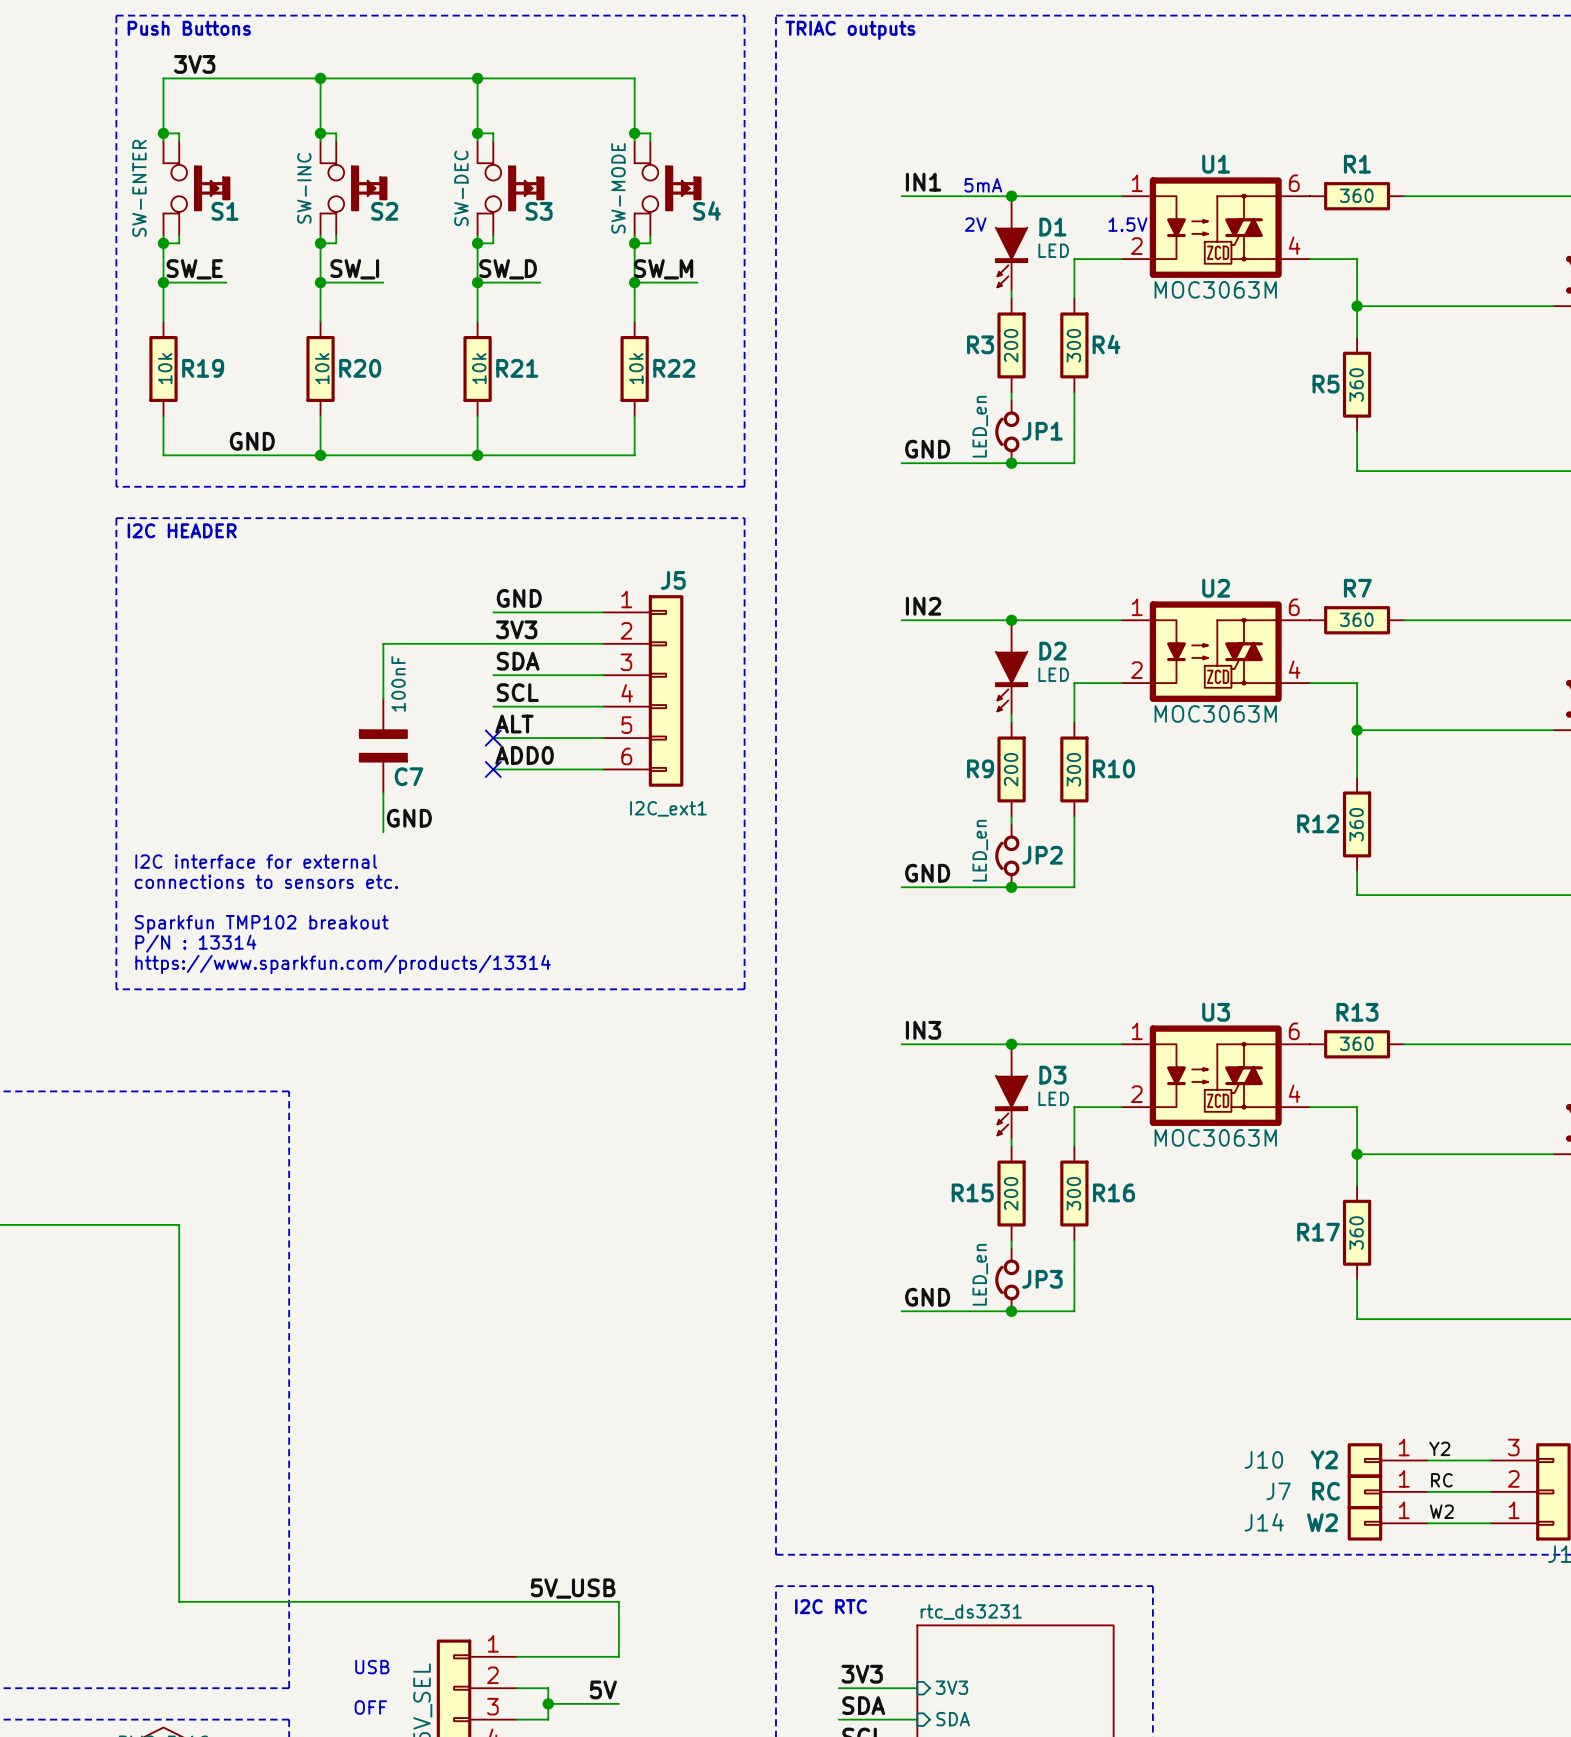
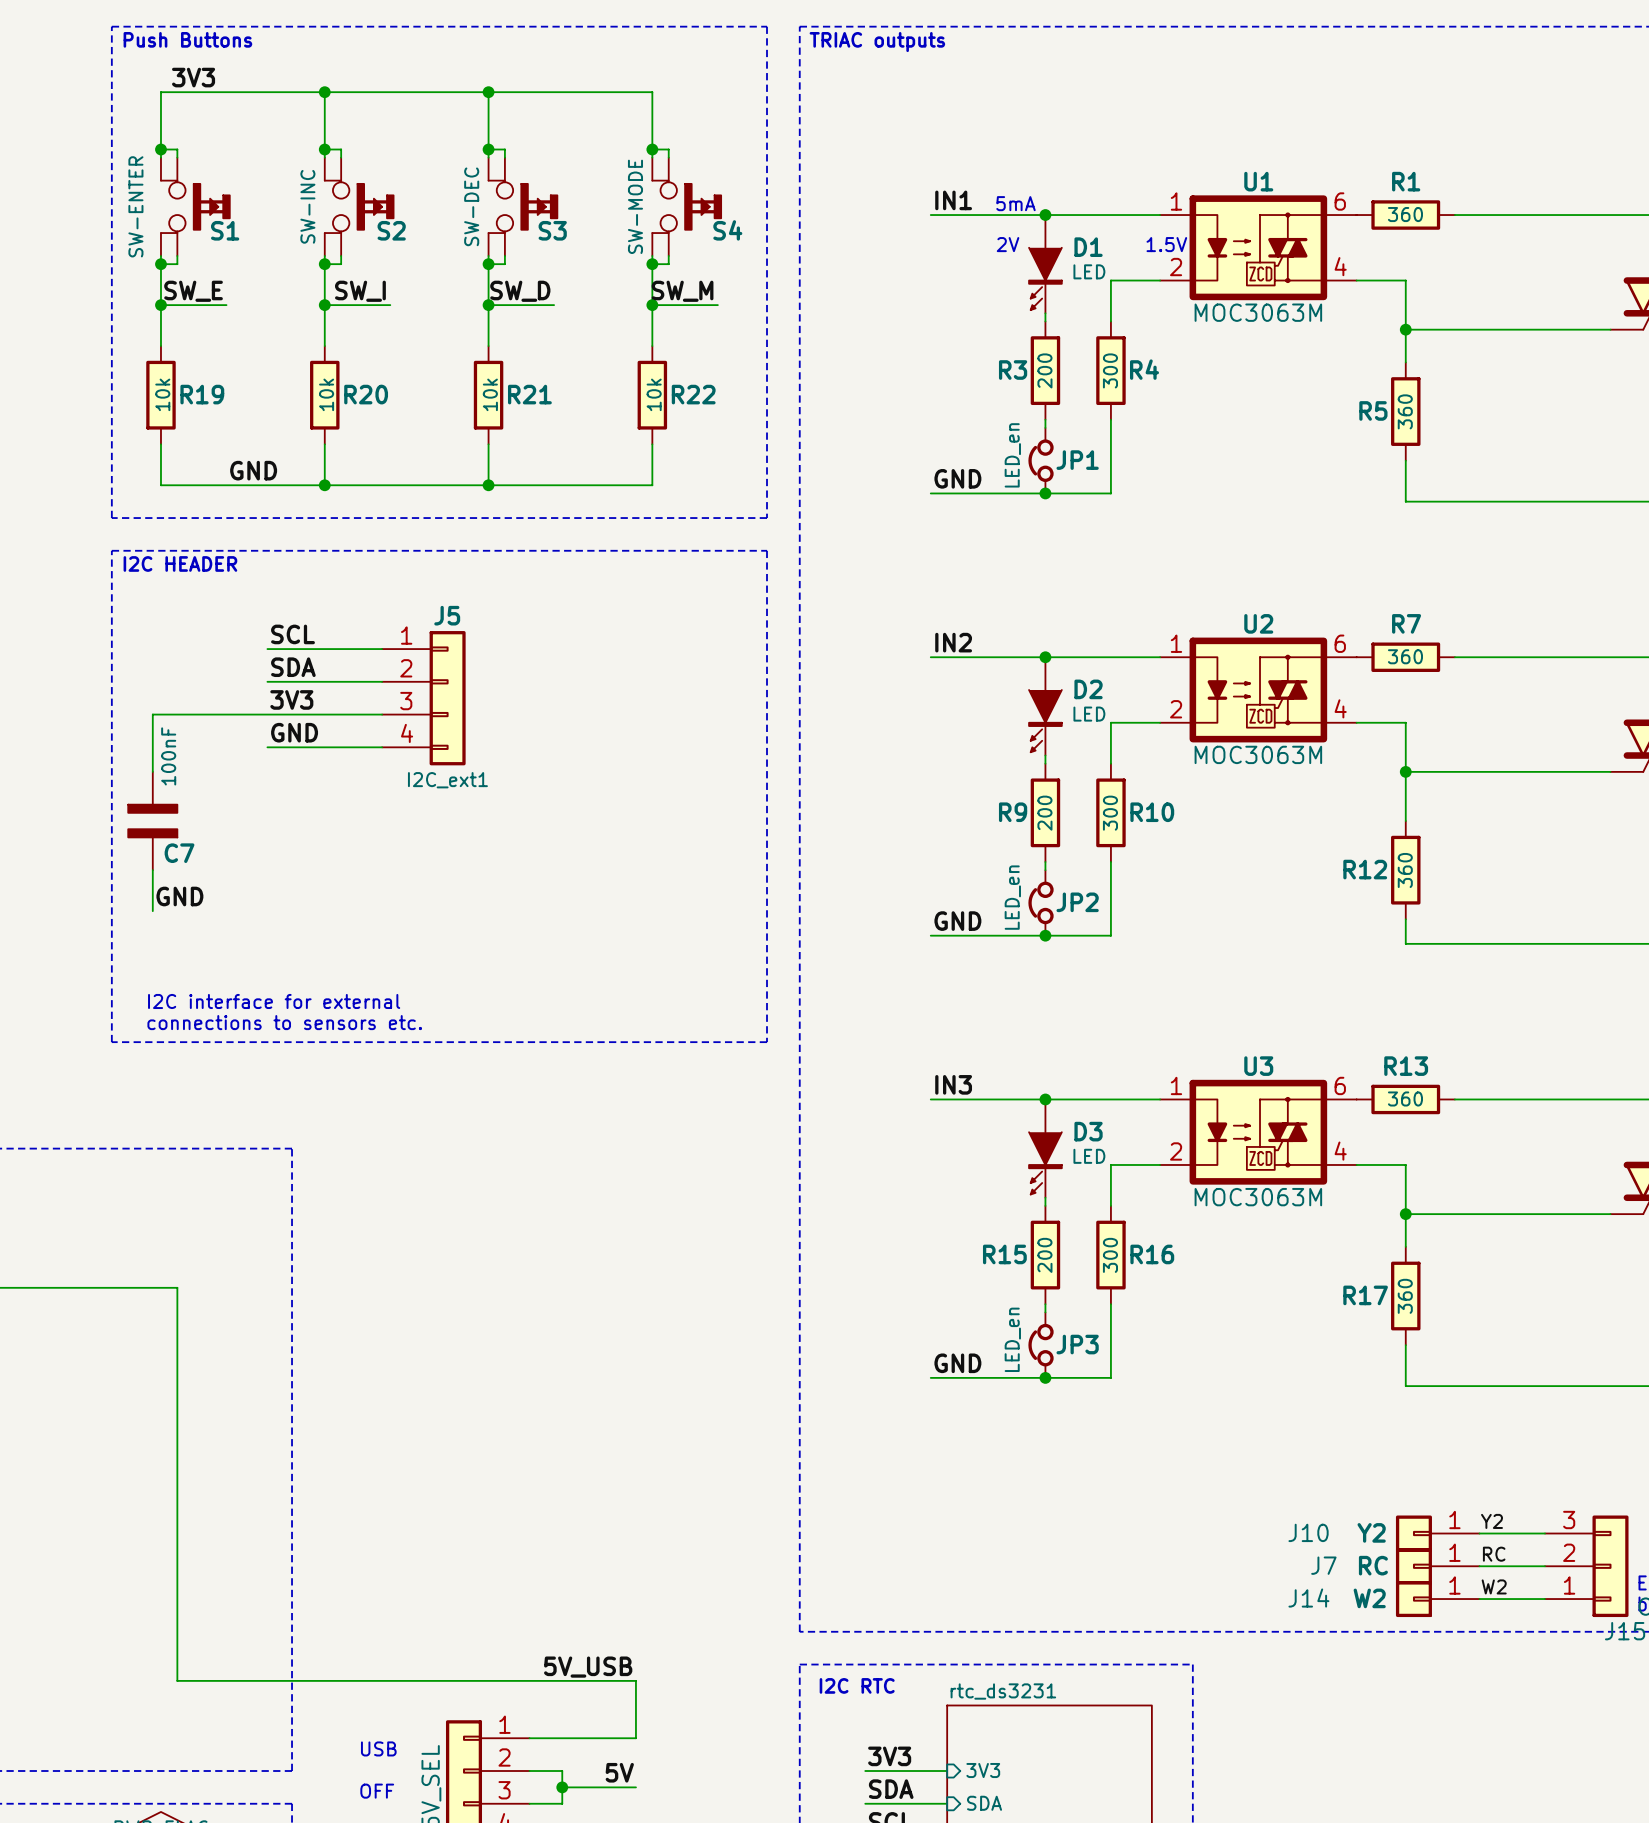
J5 name position: J5 (673, 580) -> J5 (447, 615)
J5 symbol: [603, 595, 684, 787] -> [382, 631, 466, 766]
label: GND (519, 598) -> none
wire: (493, 612) (603, 612) -> (267, 681) (382, 681)
label position: 3V3 (516, 629) -> 3V3 (291, 699)
wire: (603, 643) (383, 643) (383, 698) -> (382, 714) (152, 714) (152, 771)
label position: SDA (518, 661) -> SDA (293, 667)
wire: (493, 675) (603, 675) -> (267, 747) (382, 747)
label: none -> GND (294, 732)
label position: SCL (517, 692) -> SCL (293, 634)
wire: (493, 706) (603, 706) -> (267, 649) (382, 649)
label: ALT (514, 724) -> none
wire: (493, 738) (603, 738) -> none
no-connect mark: (493, 738) -> none
C7 position: (383, 745) -> (152, 821)
label: ADD0 (524, 755) -> none
wire: (493, 769) (603, 769) -> none
no-connect mark: (493, 769) -> none
wire: (383, 793) (383, 832) -> (152, 870) (152, 911)
J5 value position: I2C_ext1 (668, 808) -> I2C_ext1 (447, 780)
label: GND (409, 818) -> none
label: none -> GND (179, 896)
text position: I2C interface for external (256, 861) -> I2C interface for external (274, 1001)
text position: connections to sensors etc. (266, 881) -> connections to sensors etc. (284, 1022)
text: Sparkfun TMP102 breakout (261, 924) -> none
text: P/N : 13314 (195, 943) -> none
text: https://www.sparkfun.com/products/13314 (343, 964) -> none

